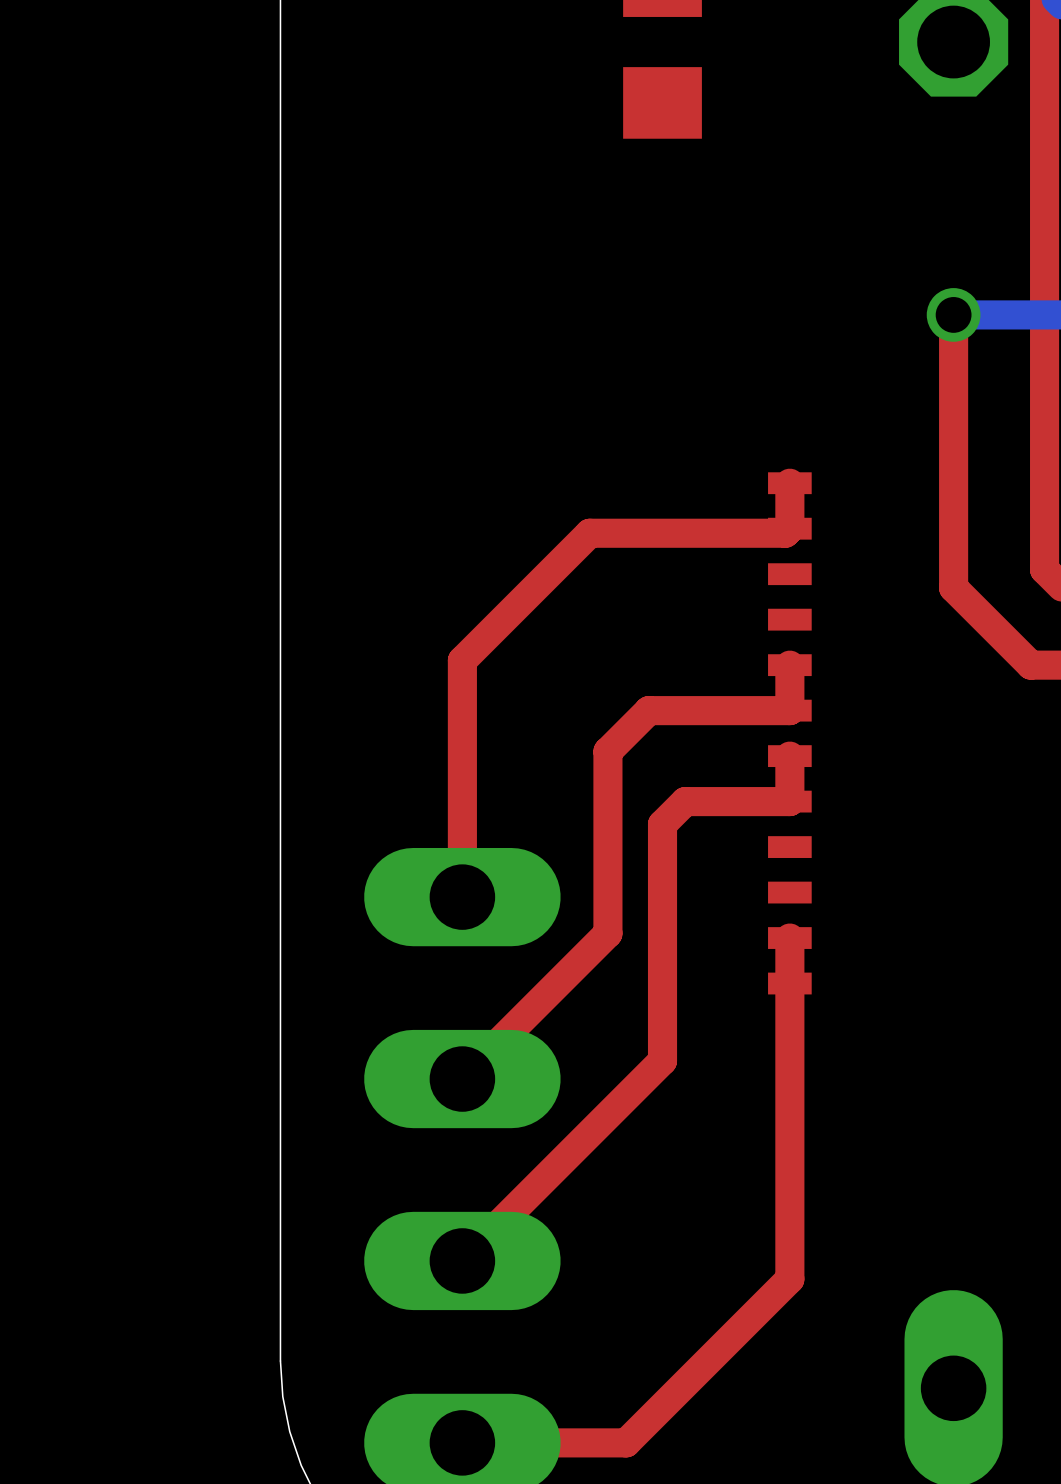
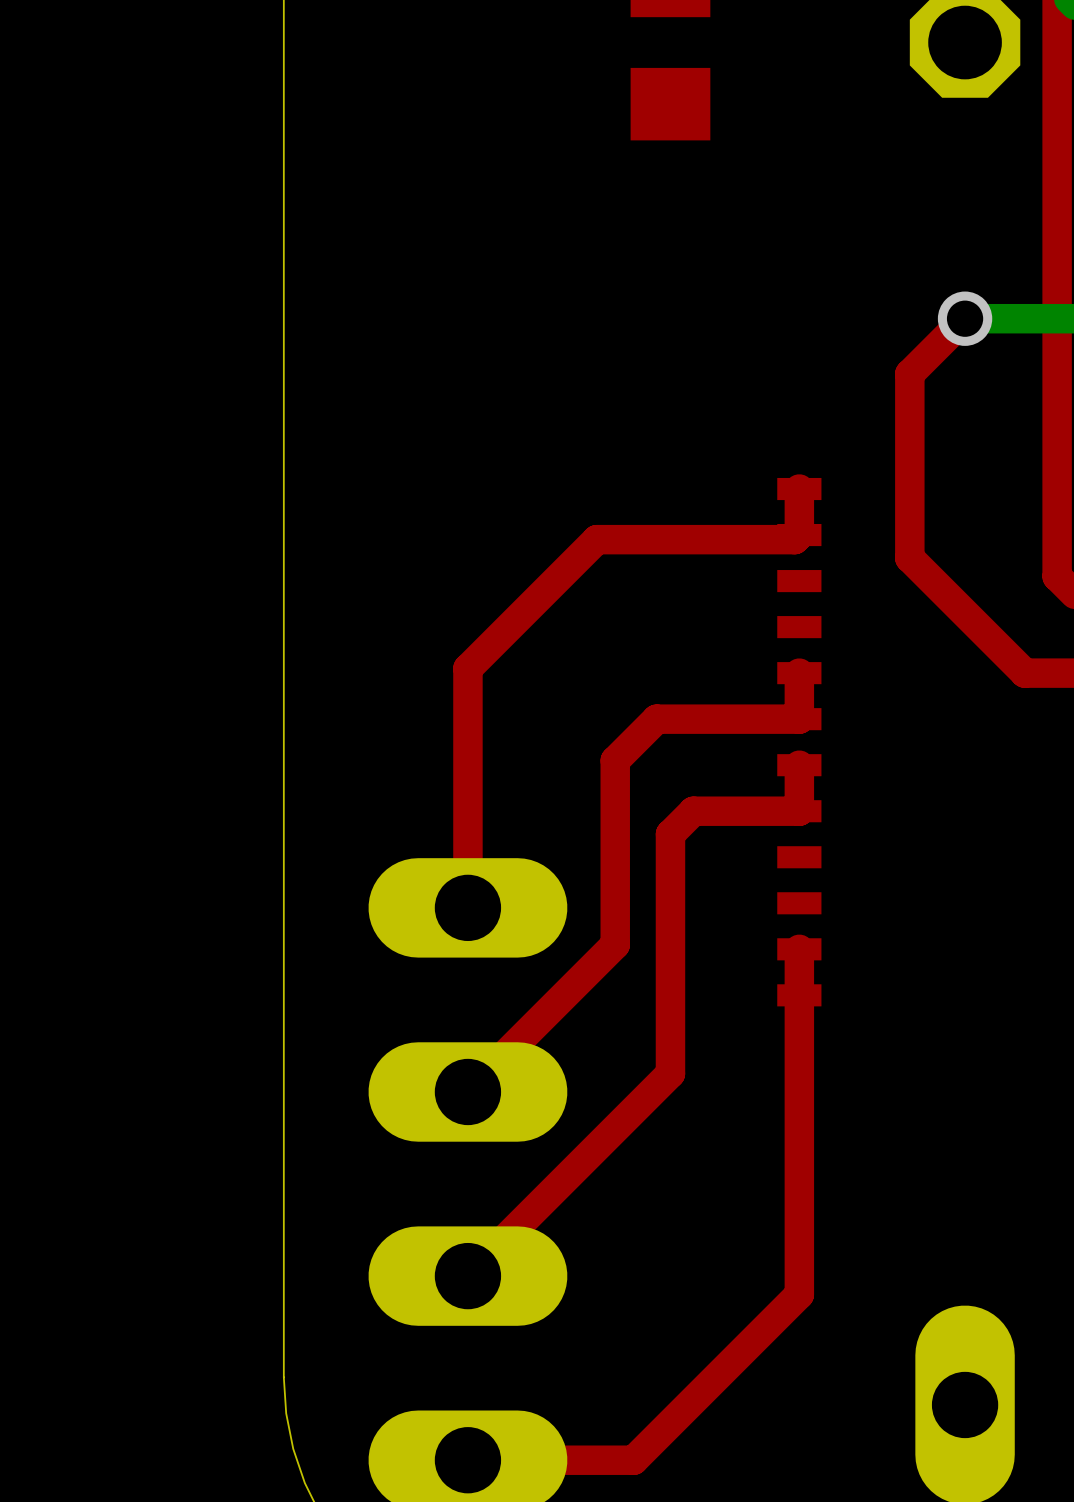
top track: (953, 314) (953, 587) (1030, 665) -> (965, 318) (909, 373) (909, 558) (1024, 673) (1043, 673)

